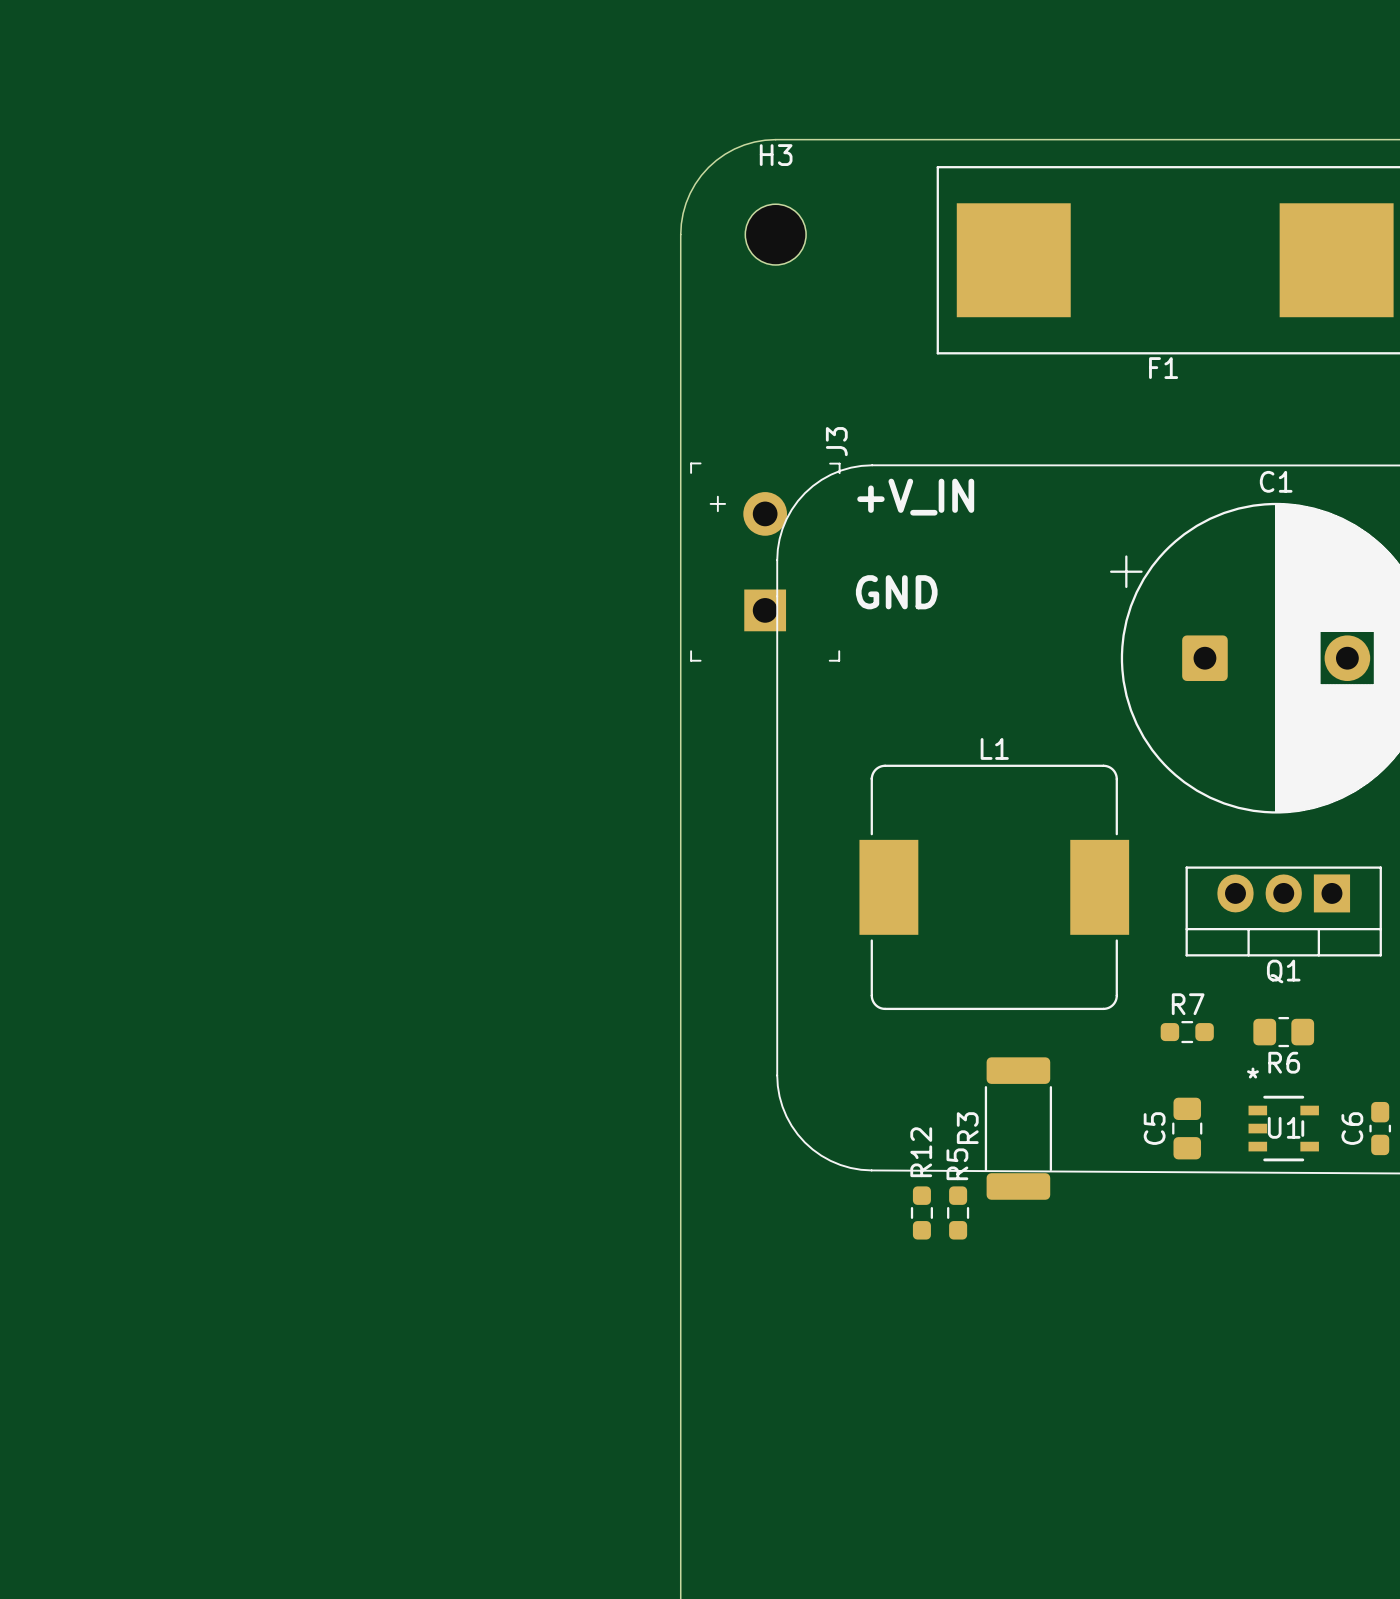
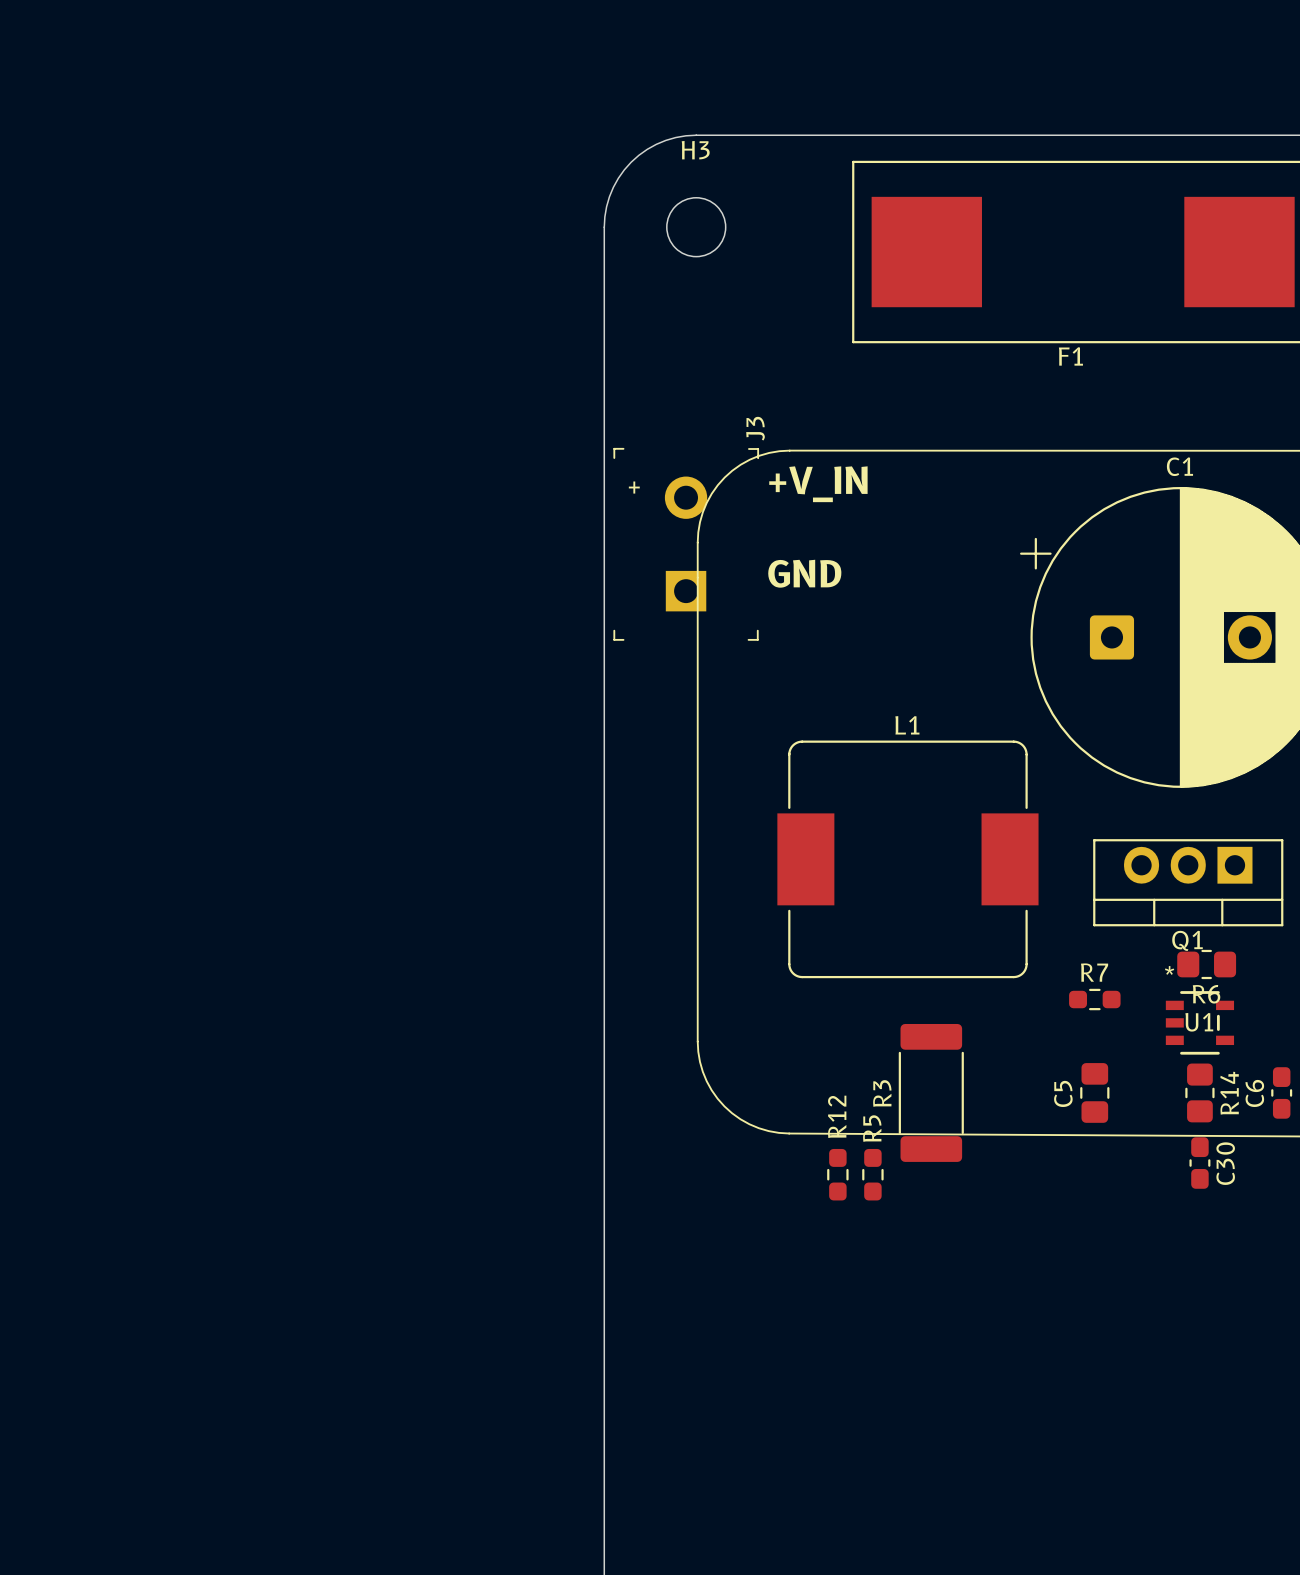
R6 position: (1283, 1032) -> (1206, 964)
U1 position: (1283, 1128) -> (1199, 1022)
R14: none -> (1199, 1092)
C30: none -> (1199, 1163)

